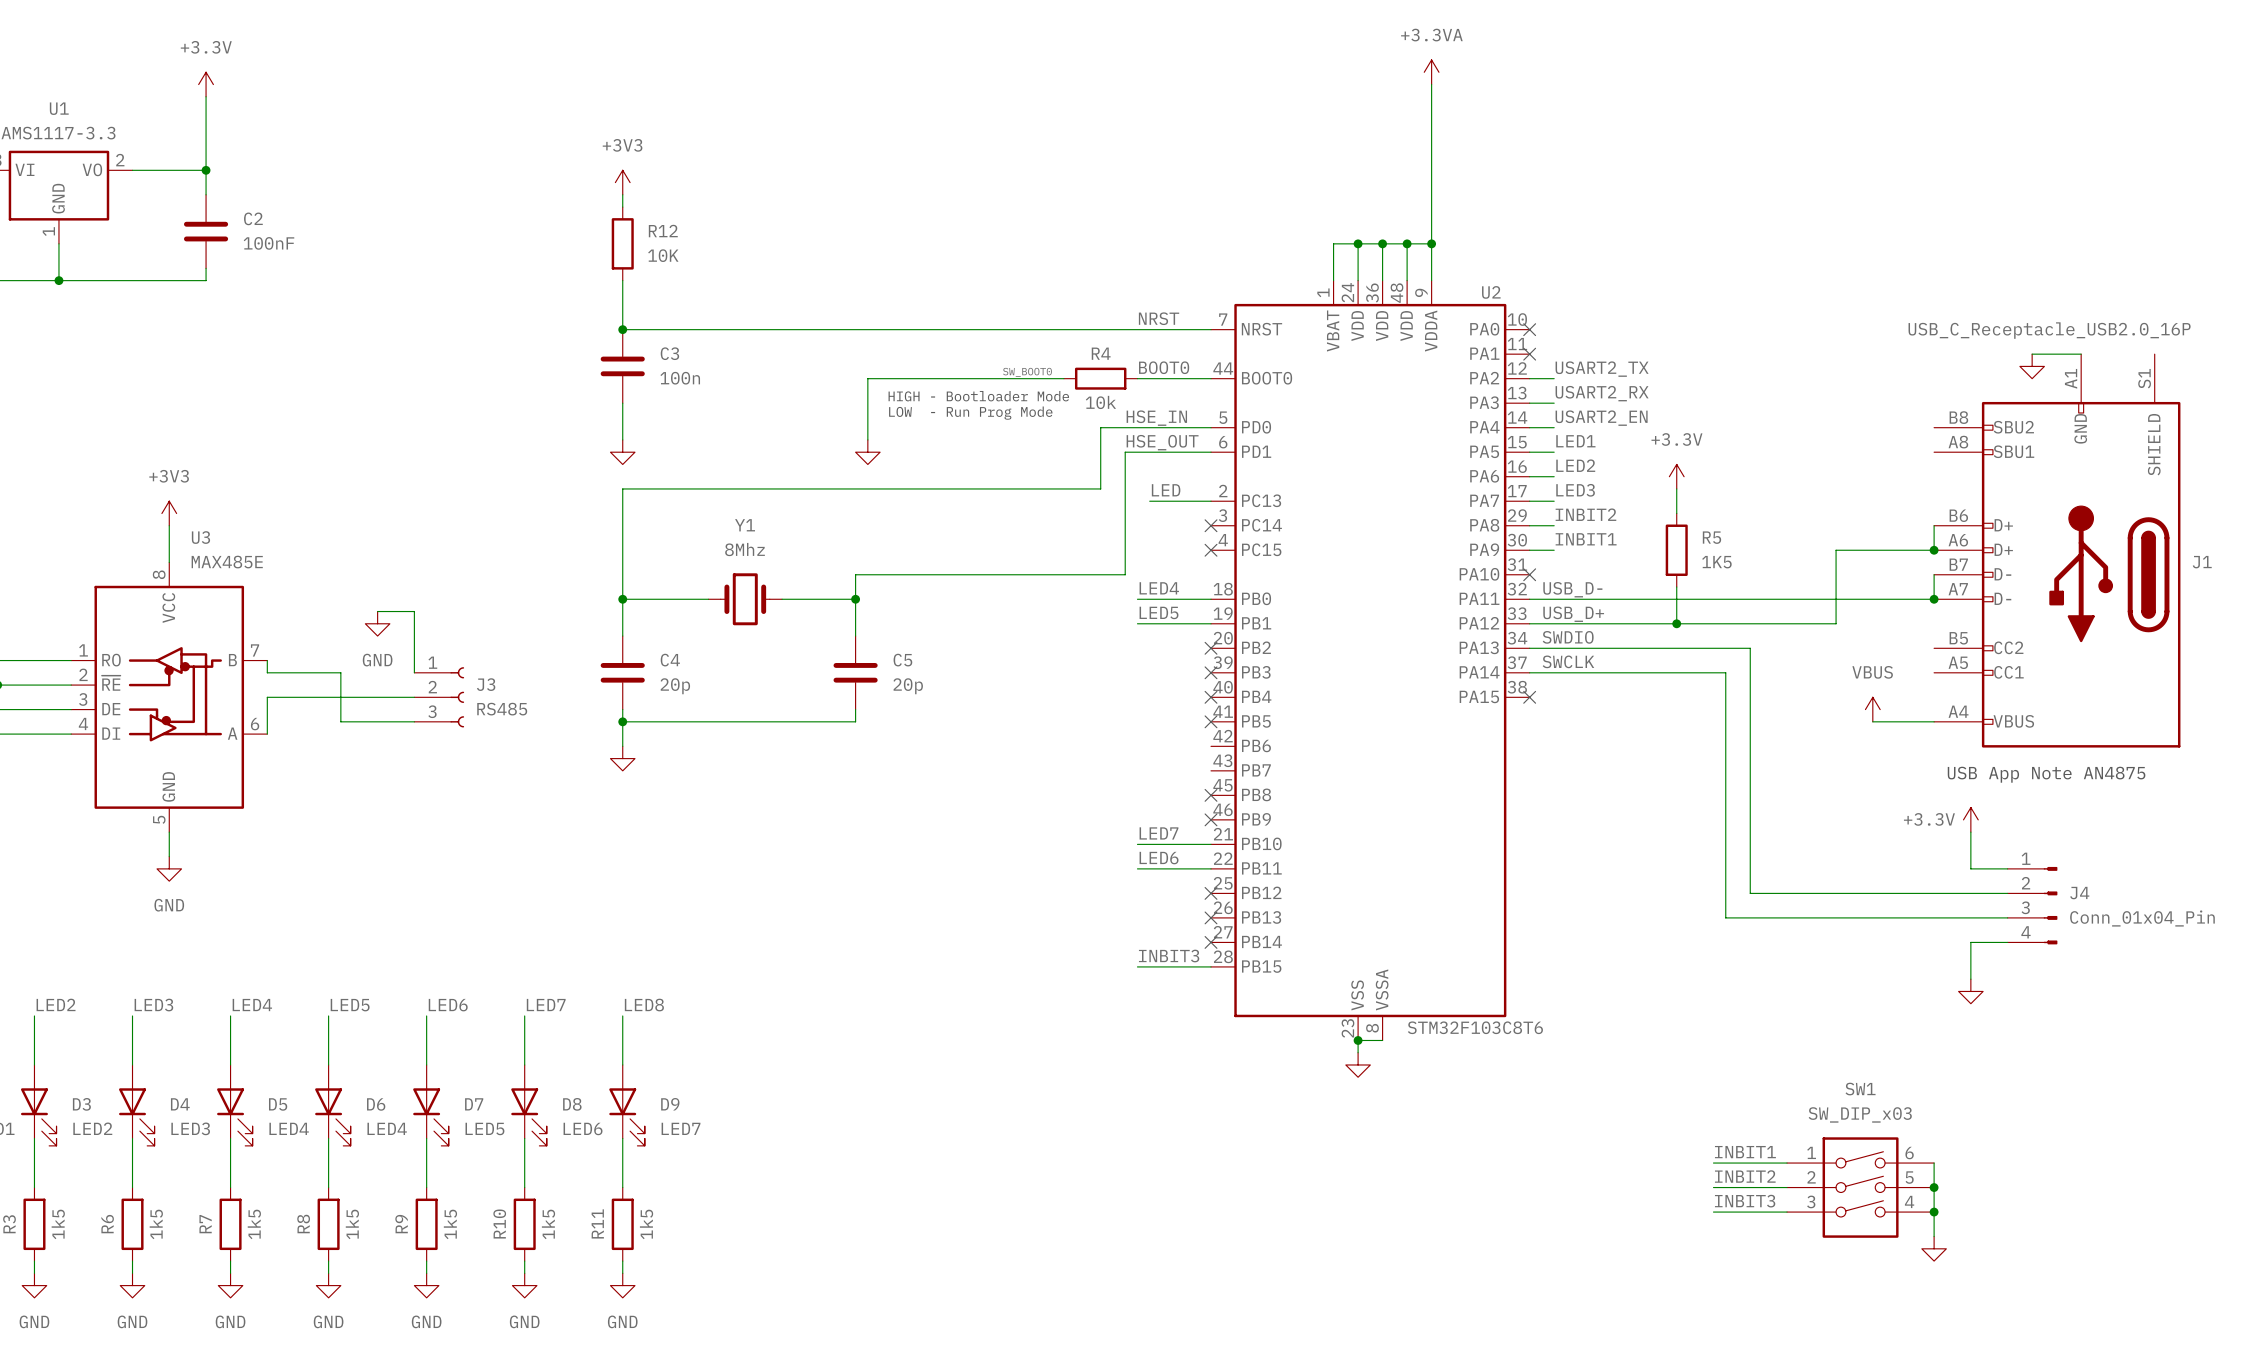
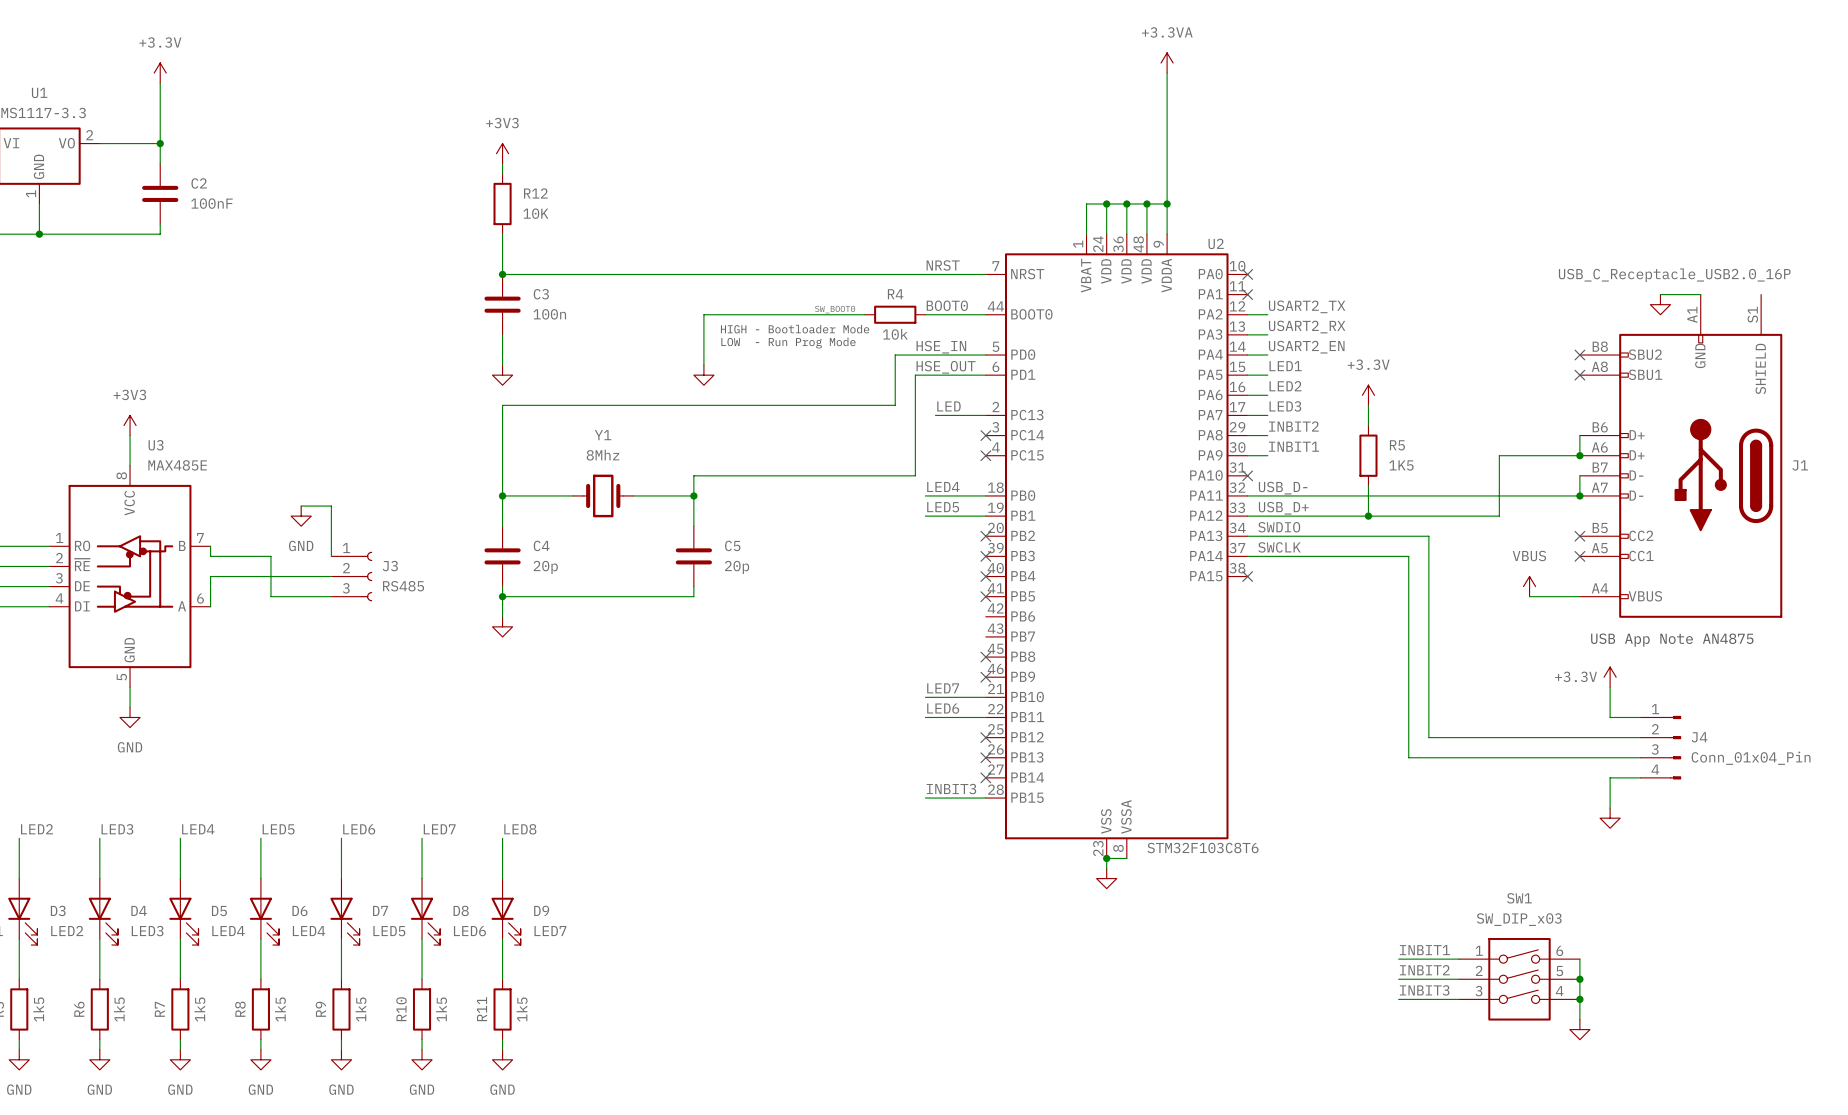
no-connect mark: none -> (1579, 355)
no-connect mark: none -> (1579, 375)
no-connect mark: none -> (1579, 536)
no-connect mark: none -> (1579, 556)

